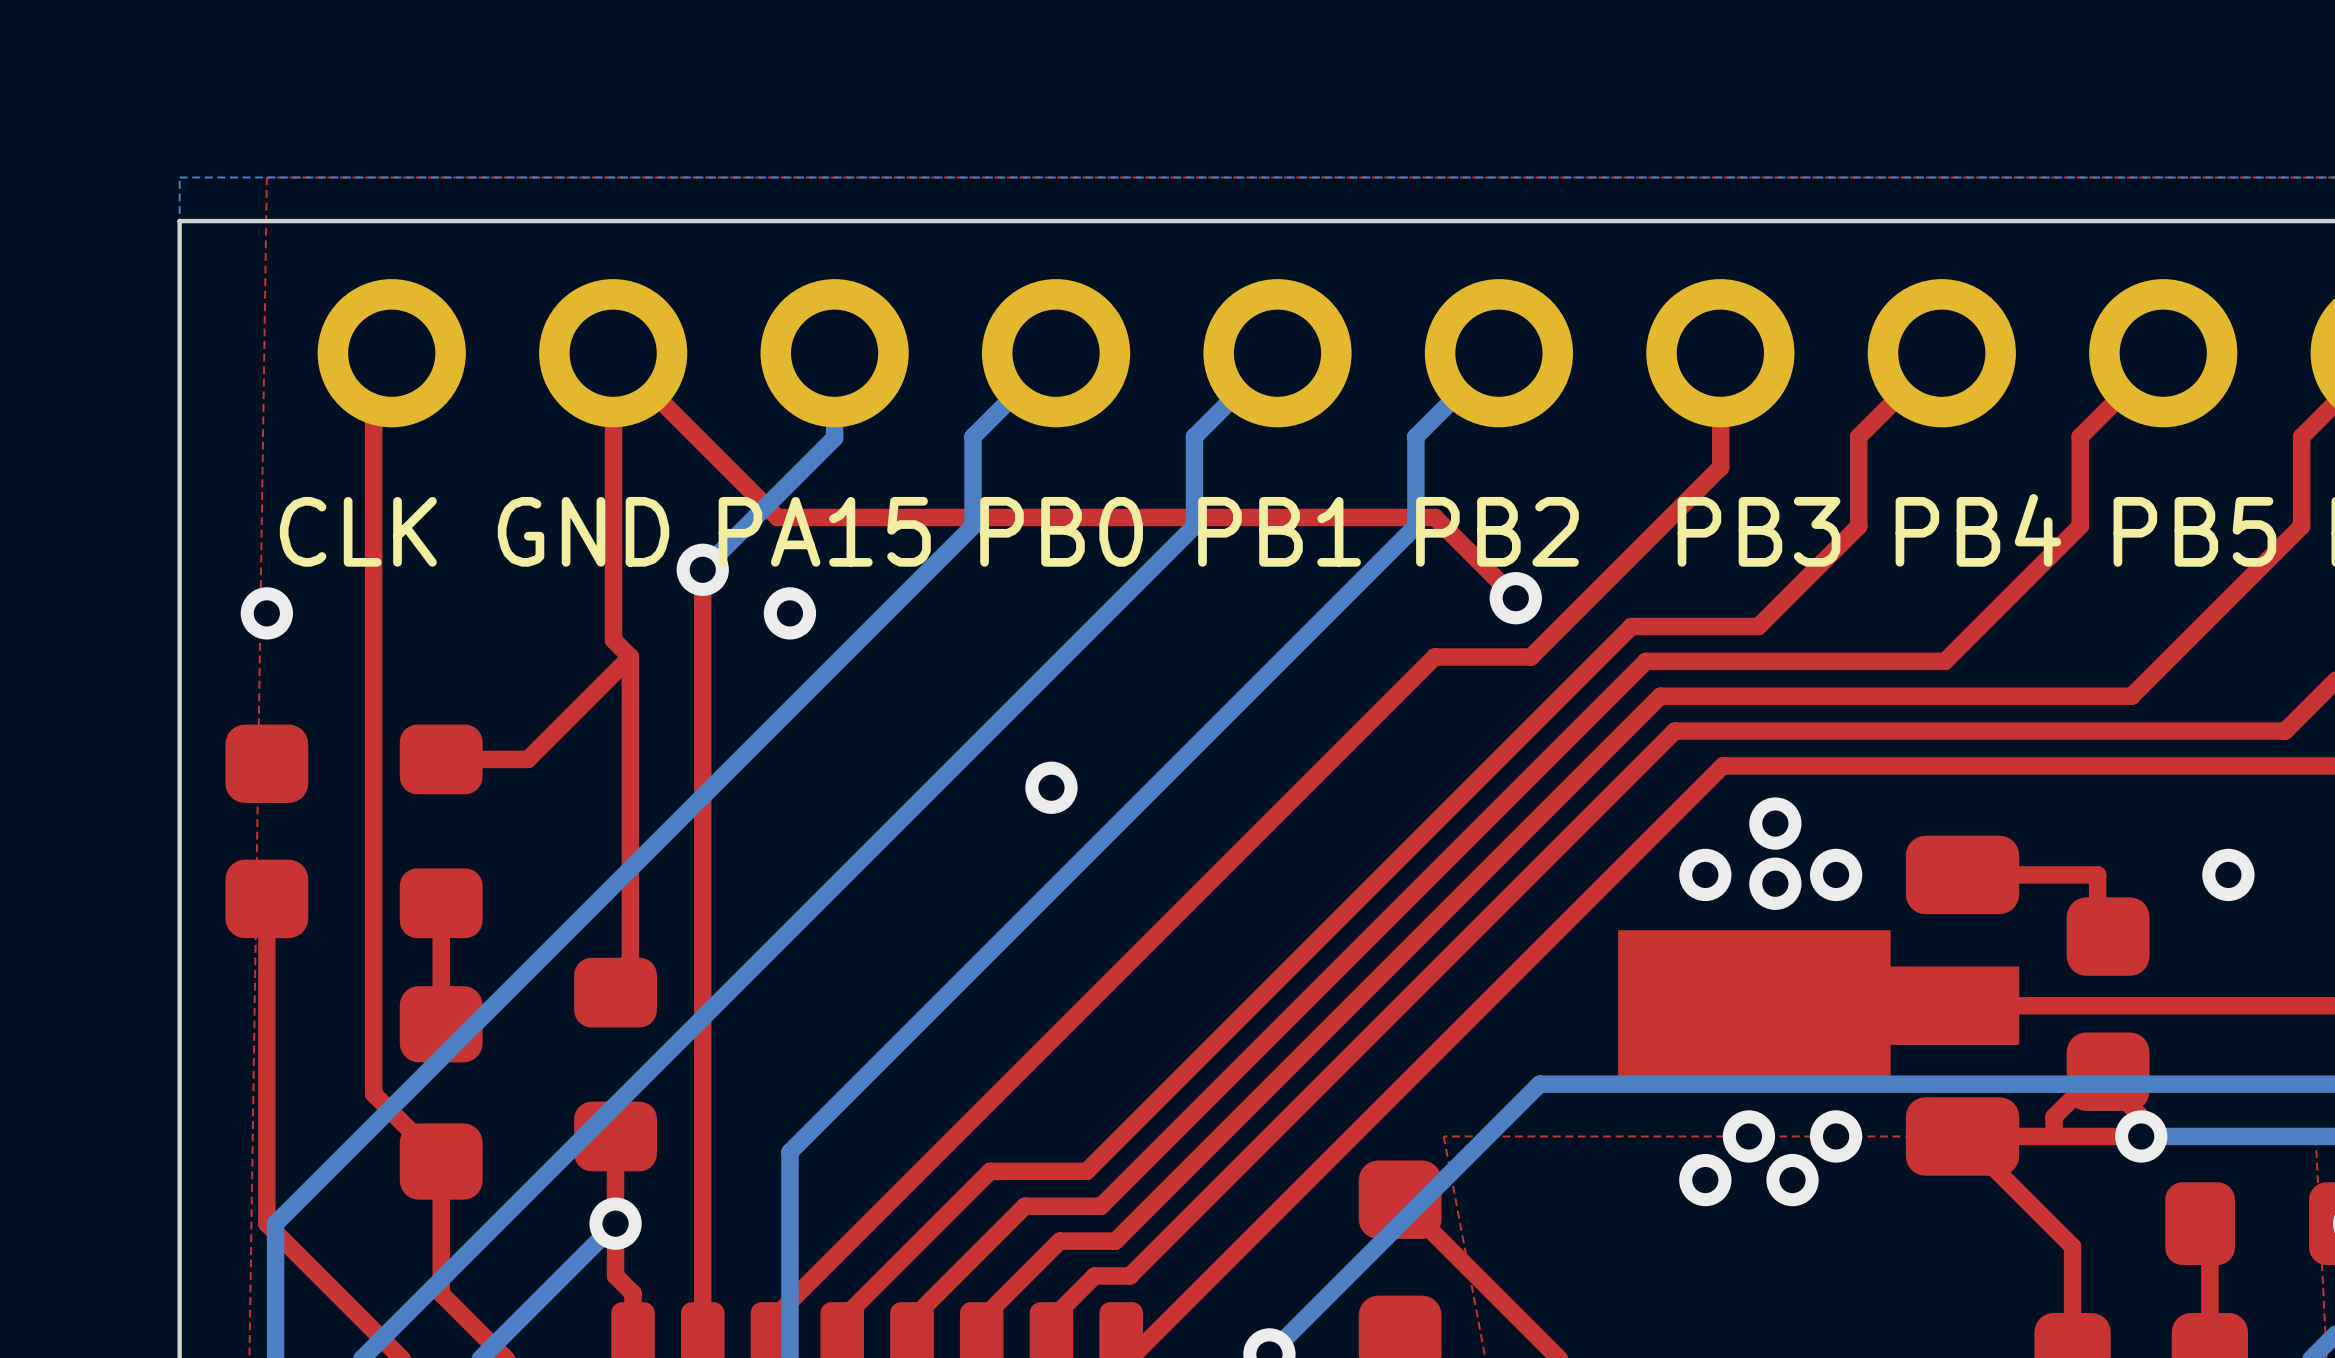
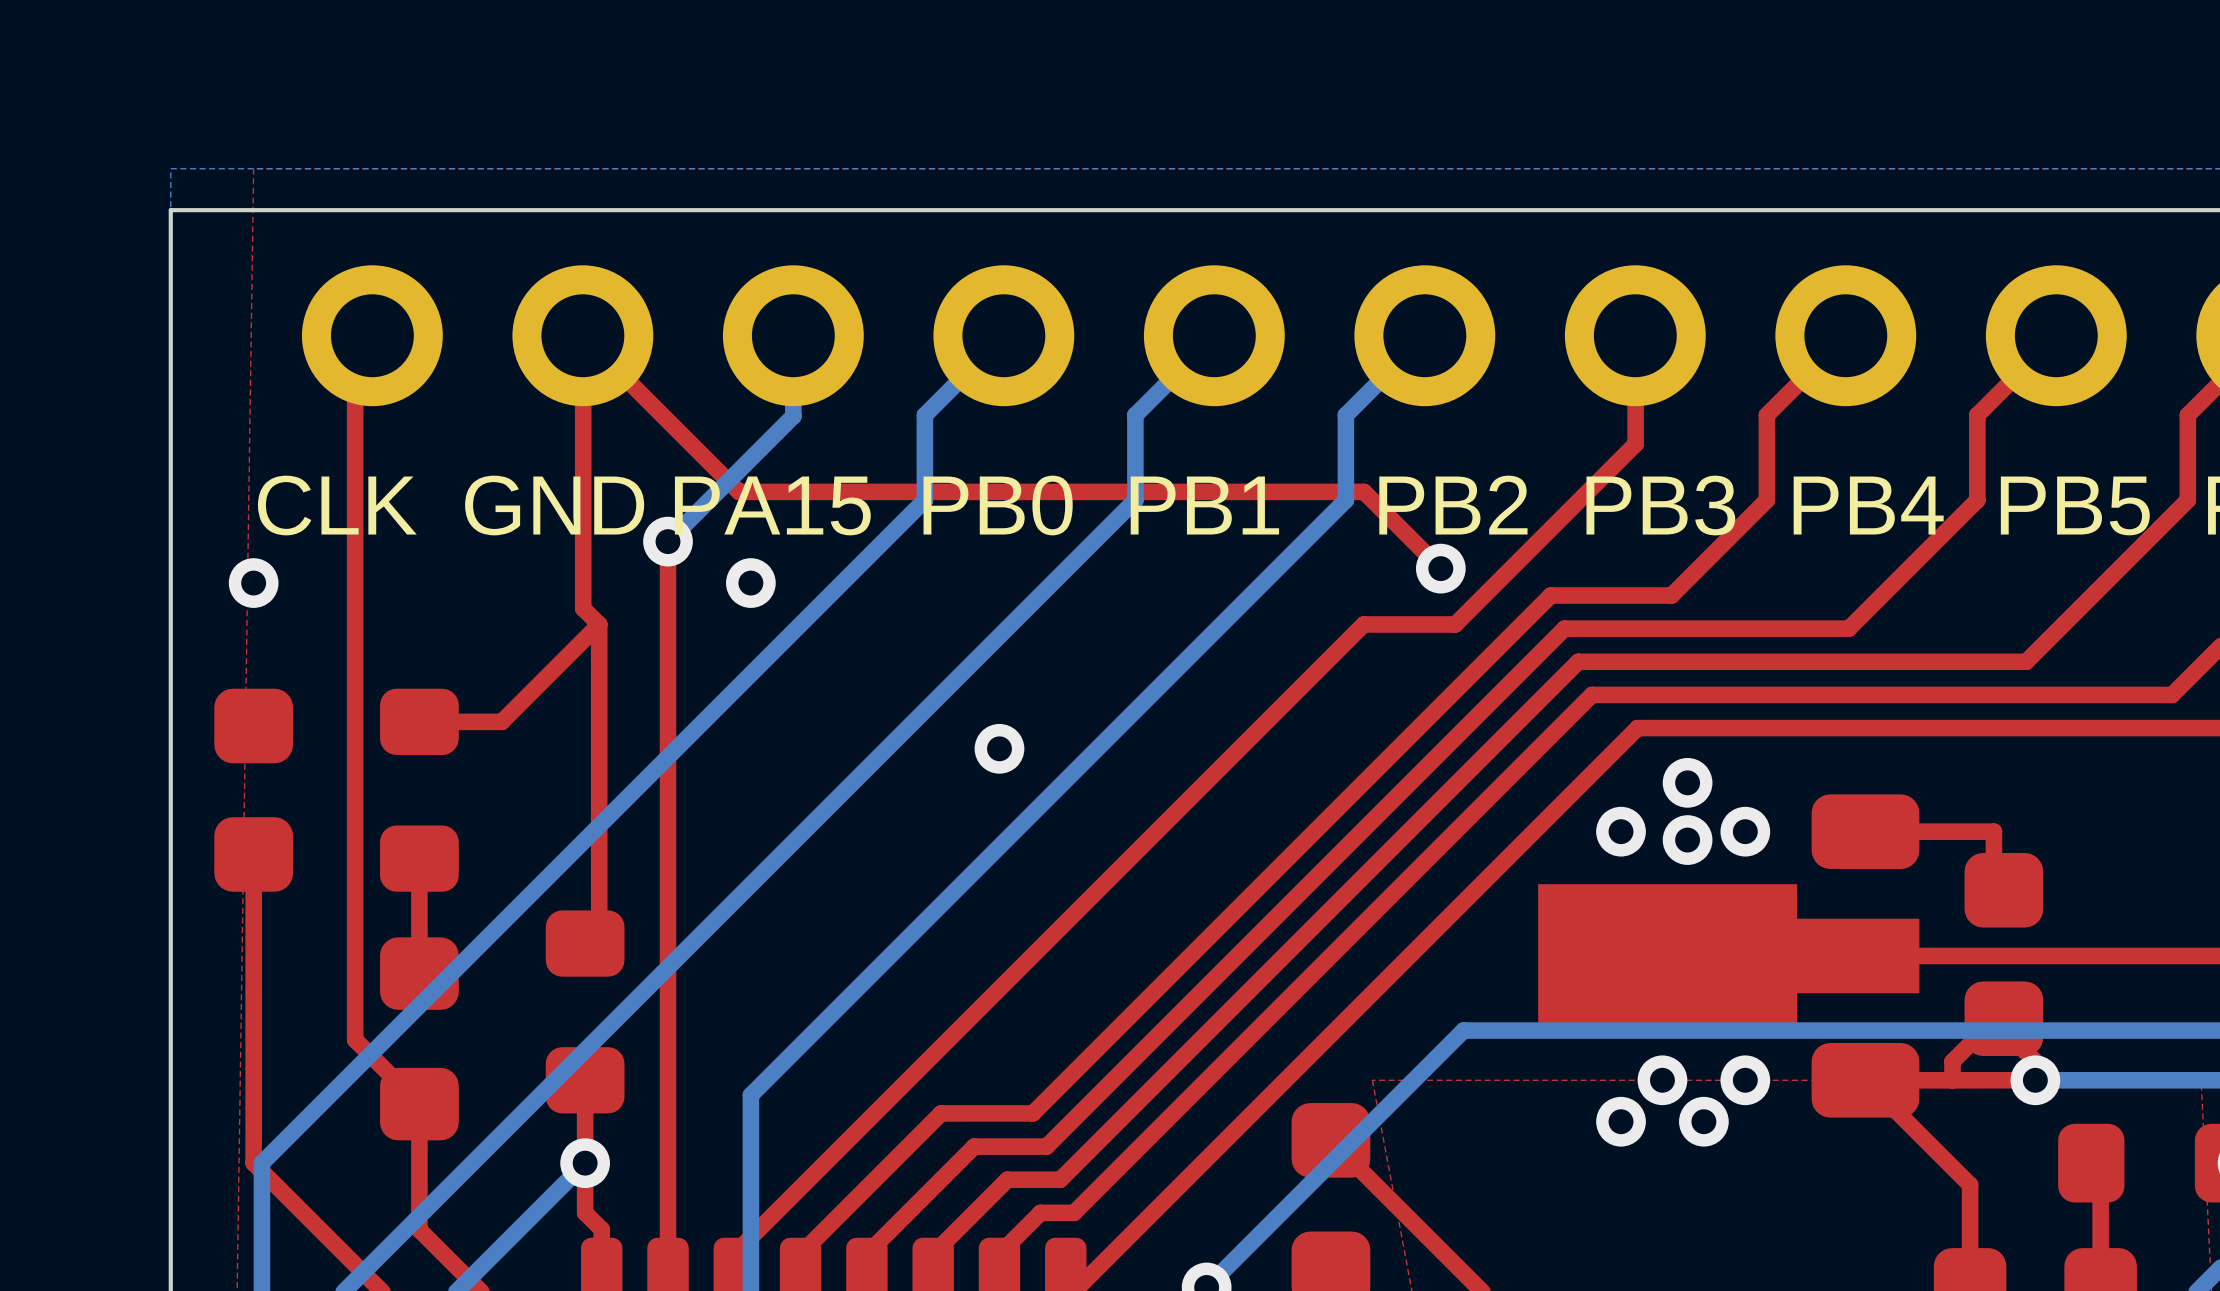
text position: PB2 (1497, 531) -> PB2 (1453, 505)
via: (2228, 874) -> none

